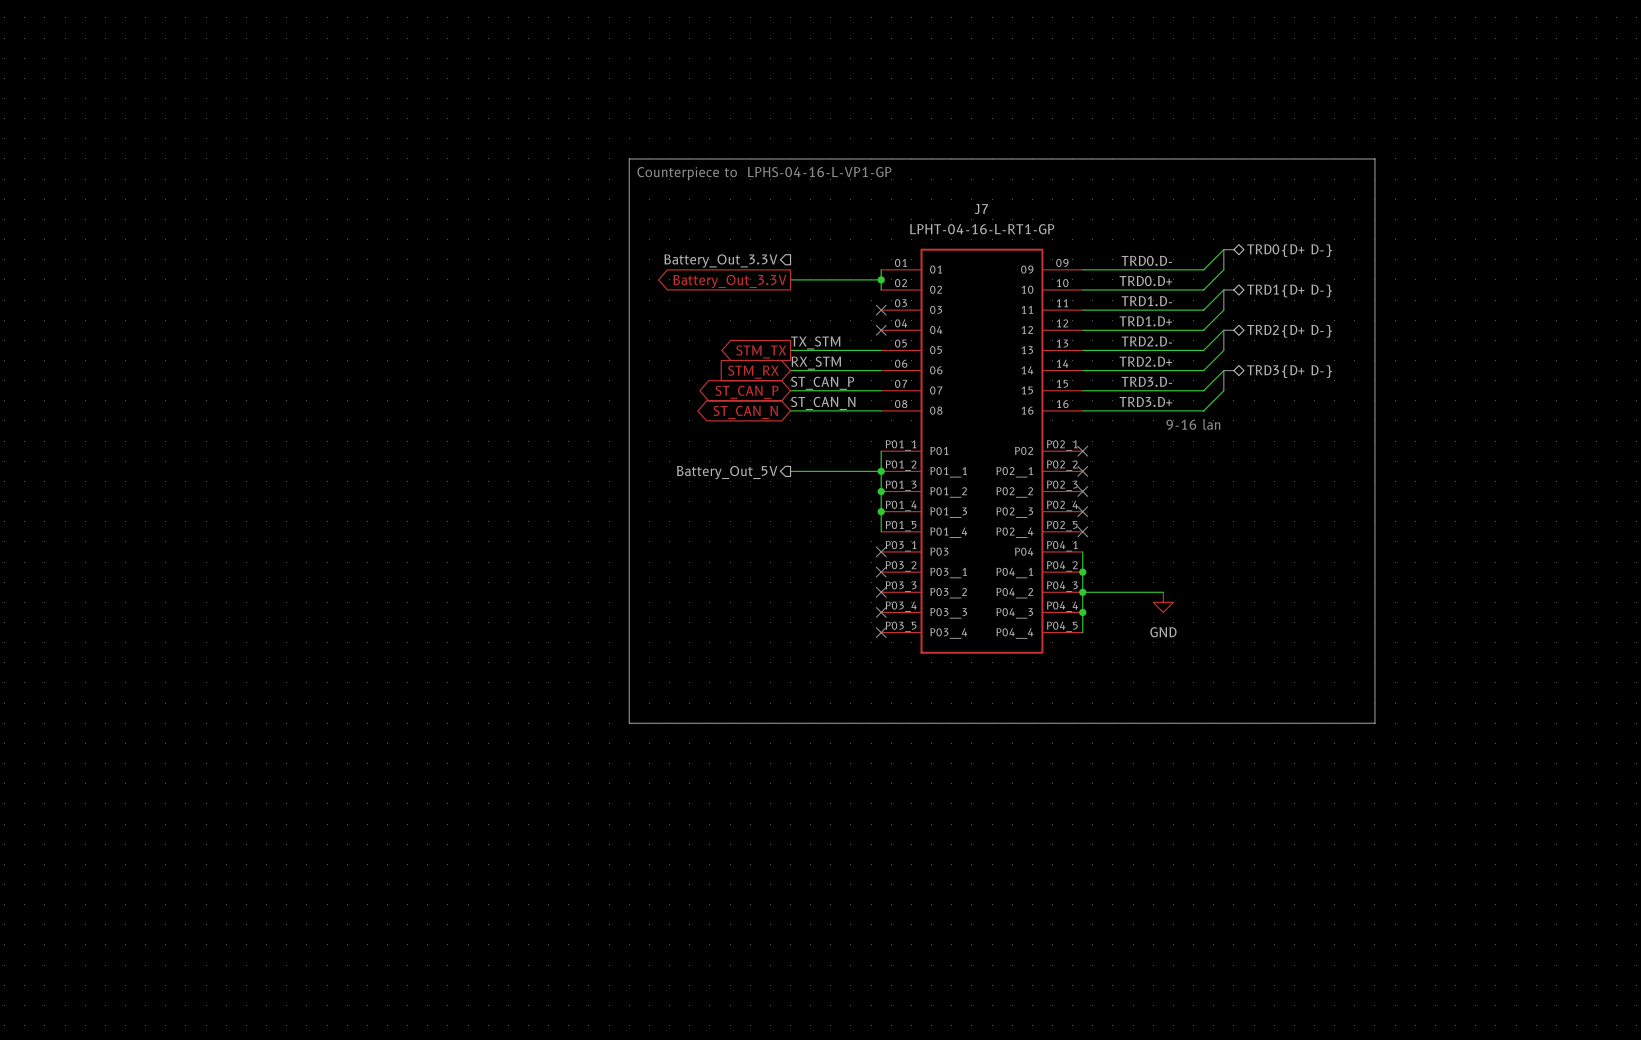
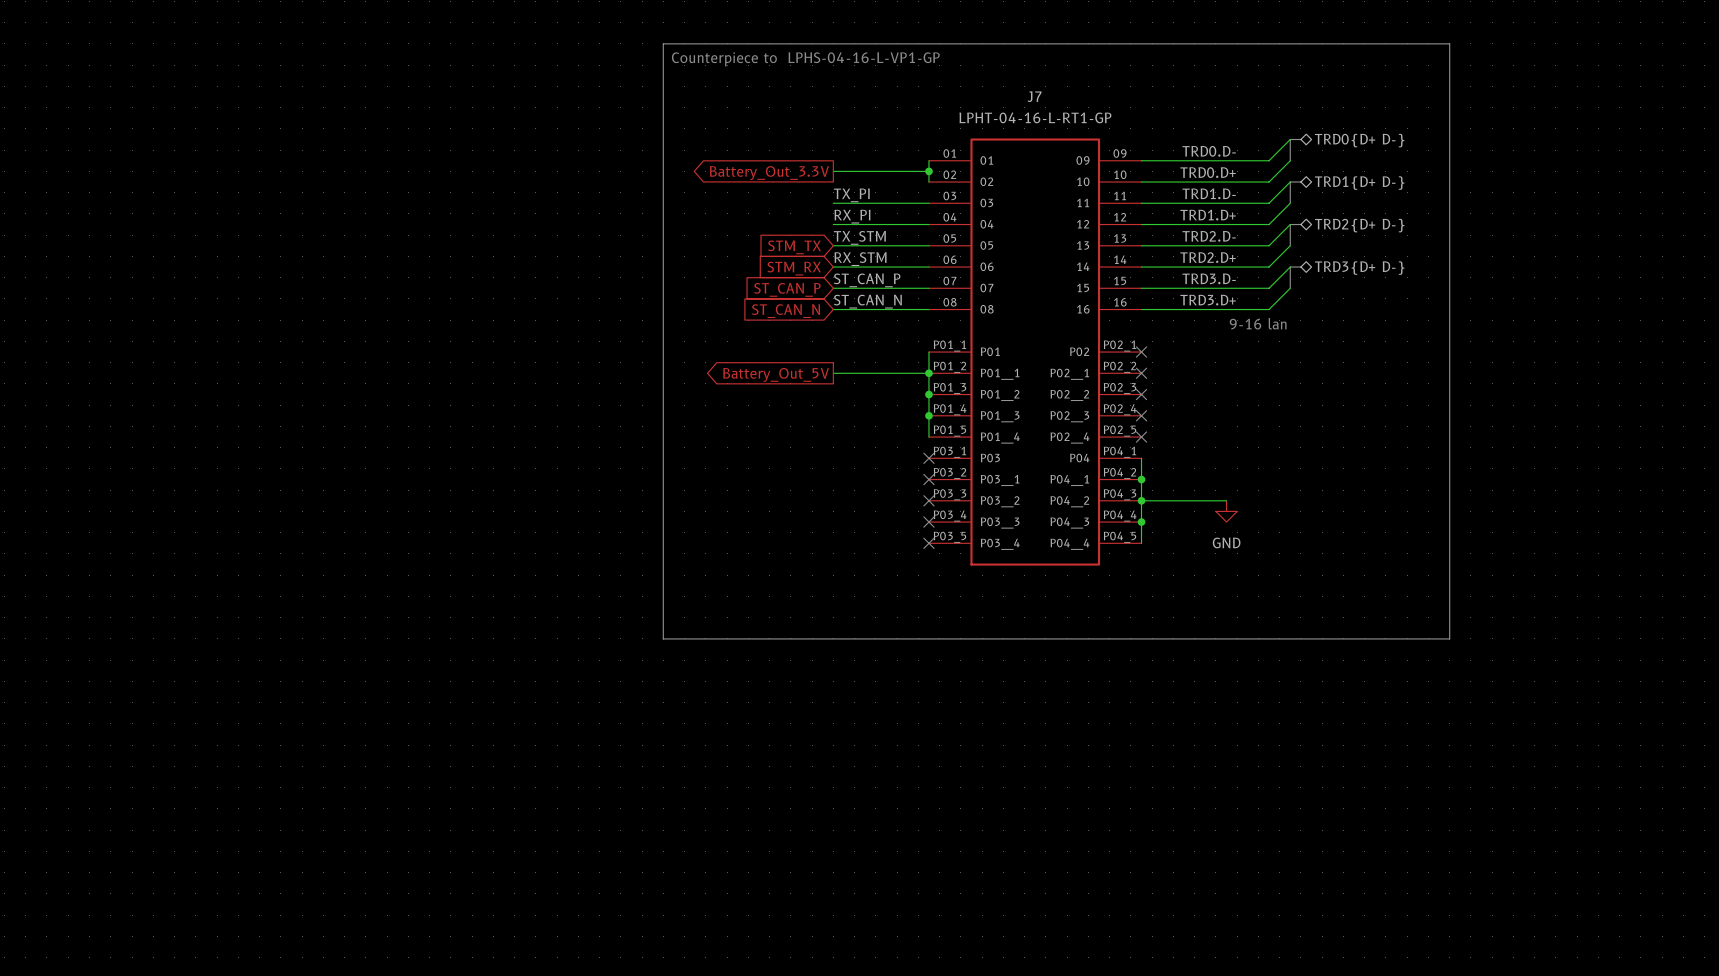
hierarchical label: Battery_Out_3.3V (720, 260) -> none
label: none -> TX_PI (851, 195)
wire: none -> (833, 203) (928, 203)
no-connect mark: (881, 310) -> none
label: none -> RX_PI (852, 216)
wire: none -> (833, 224) (928, 224)
no-connect mark: (881, 330) -> none
global label shape: output (761, 351) -> input (794, 247)
global label shape: bidirectional (746, 392) -> input (787, 289)
global label shape: bidirectional (745, 412) -> input (786, 311)
hierarchical label: Battery_Out_5V (727, 472) -> none
global label: none -> Battery_Out_5V (776, 374)

